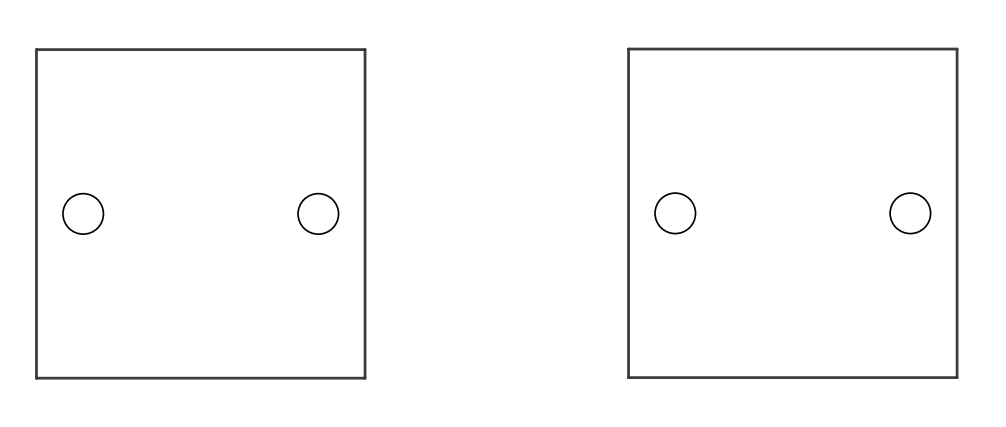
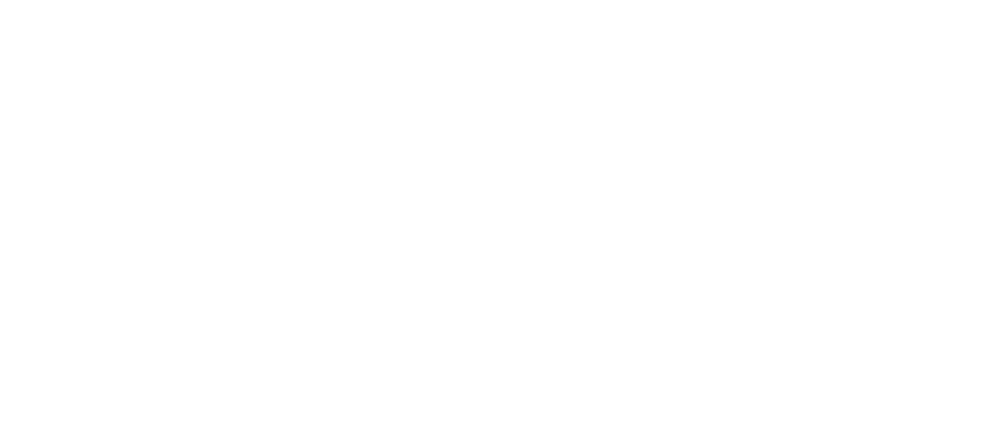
part: (200, 213) -> none
part: (792, 213) -> none

